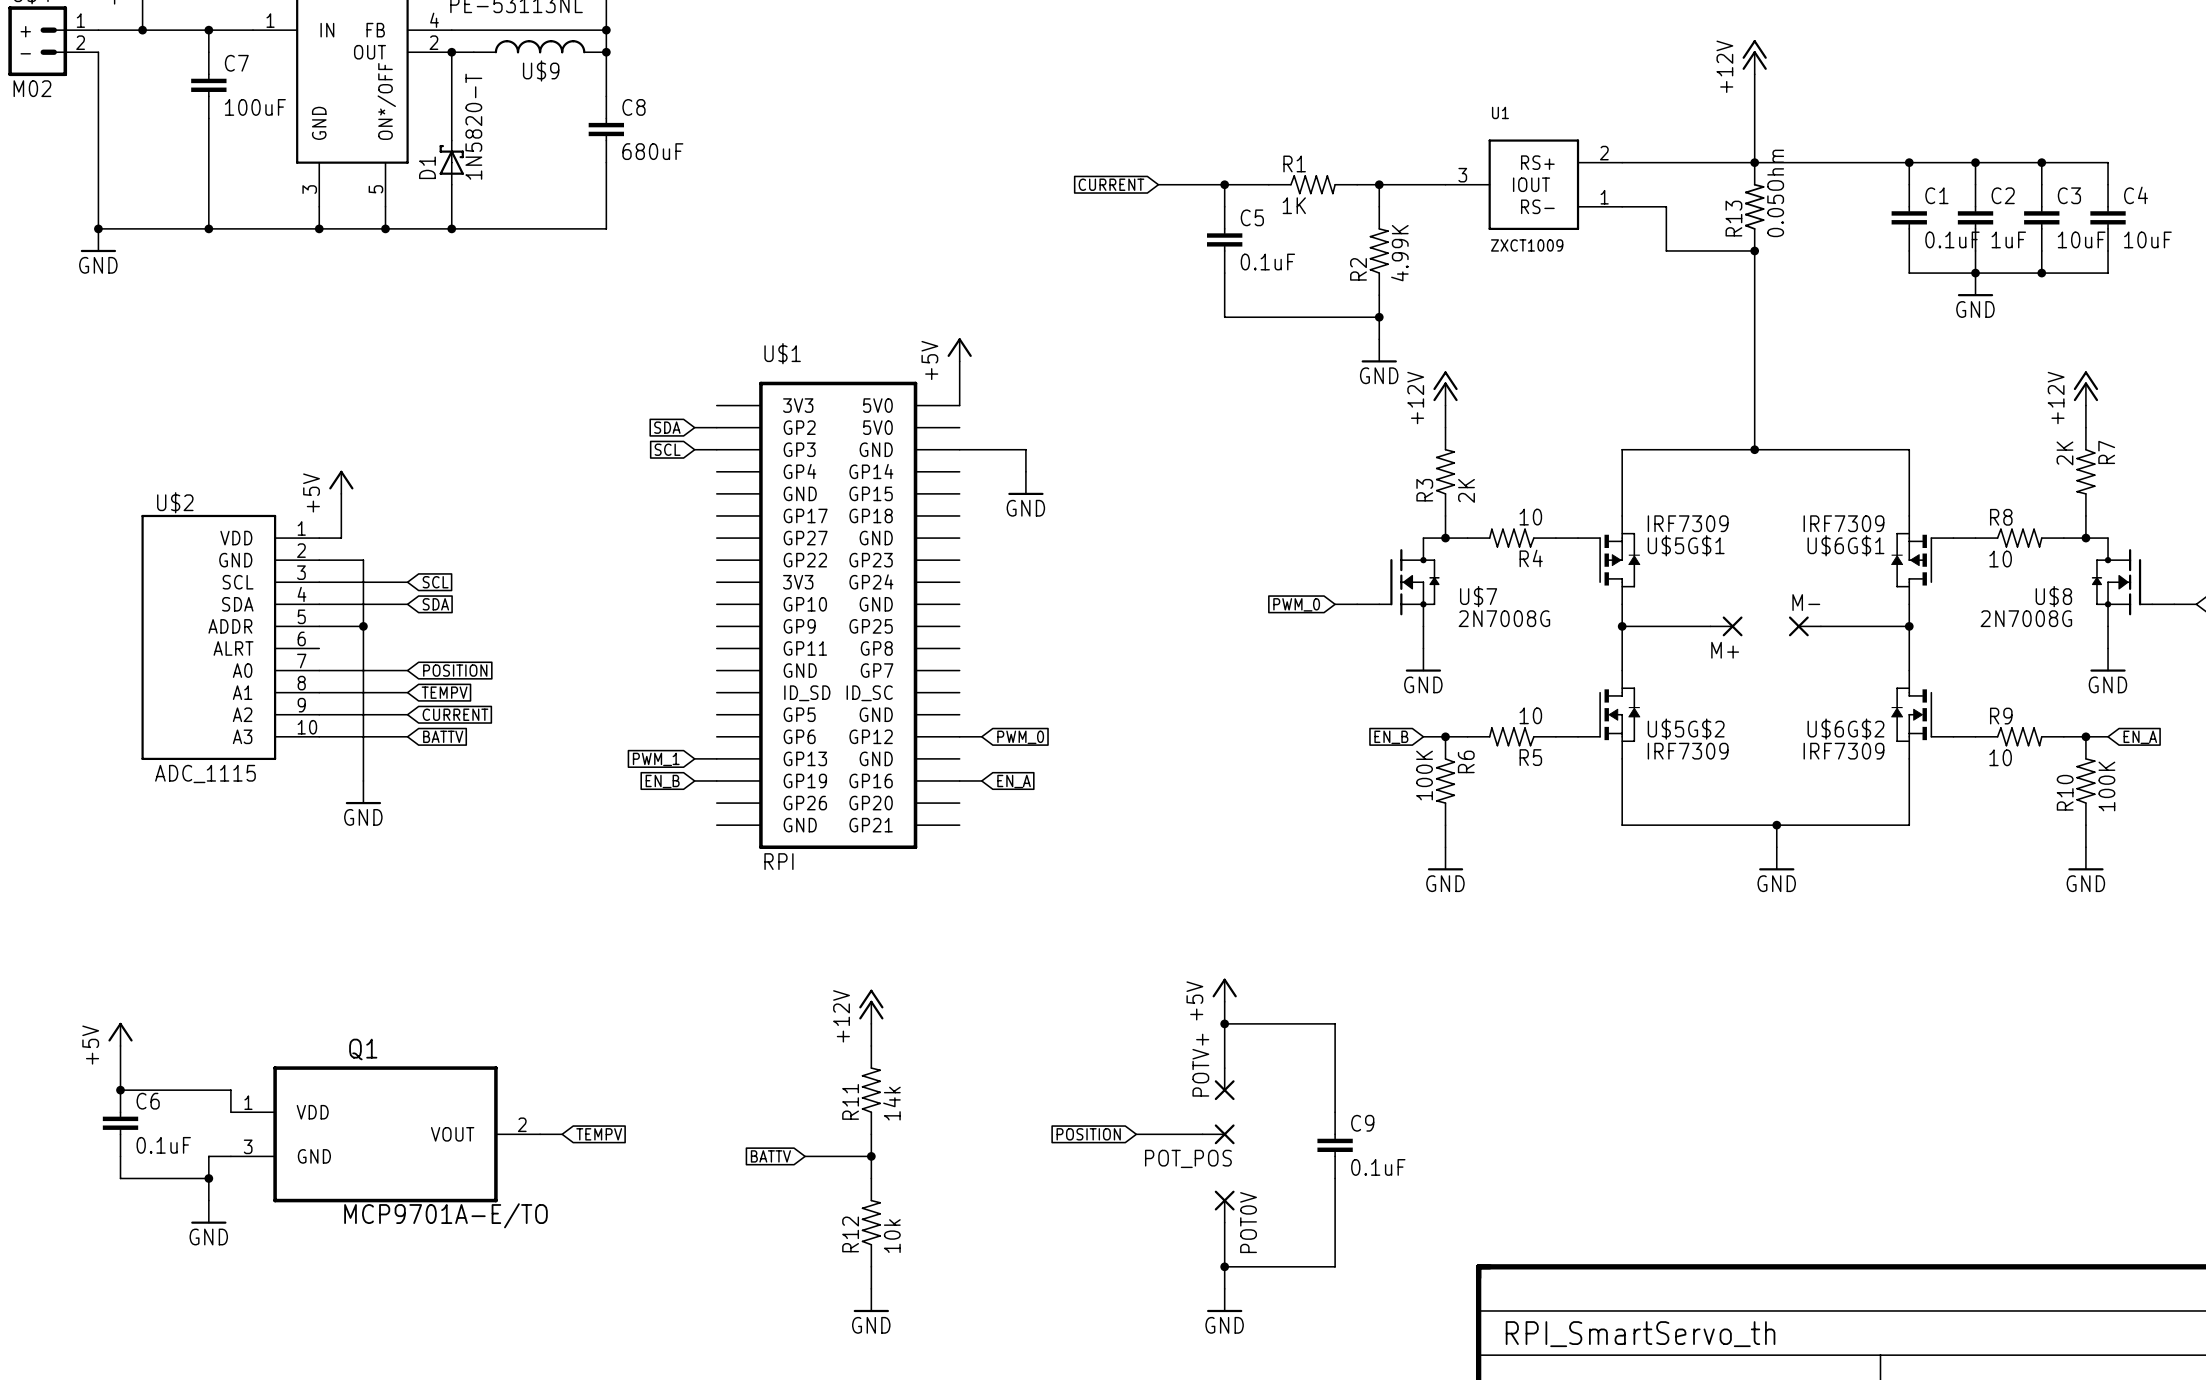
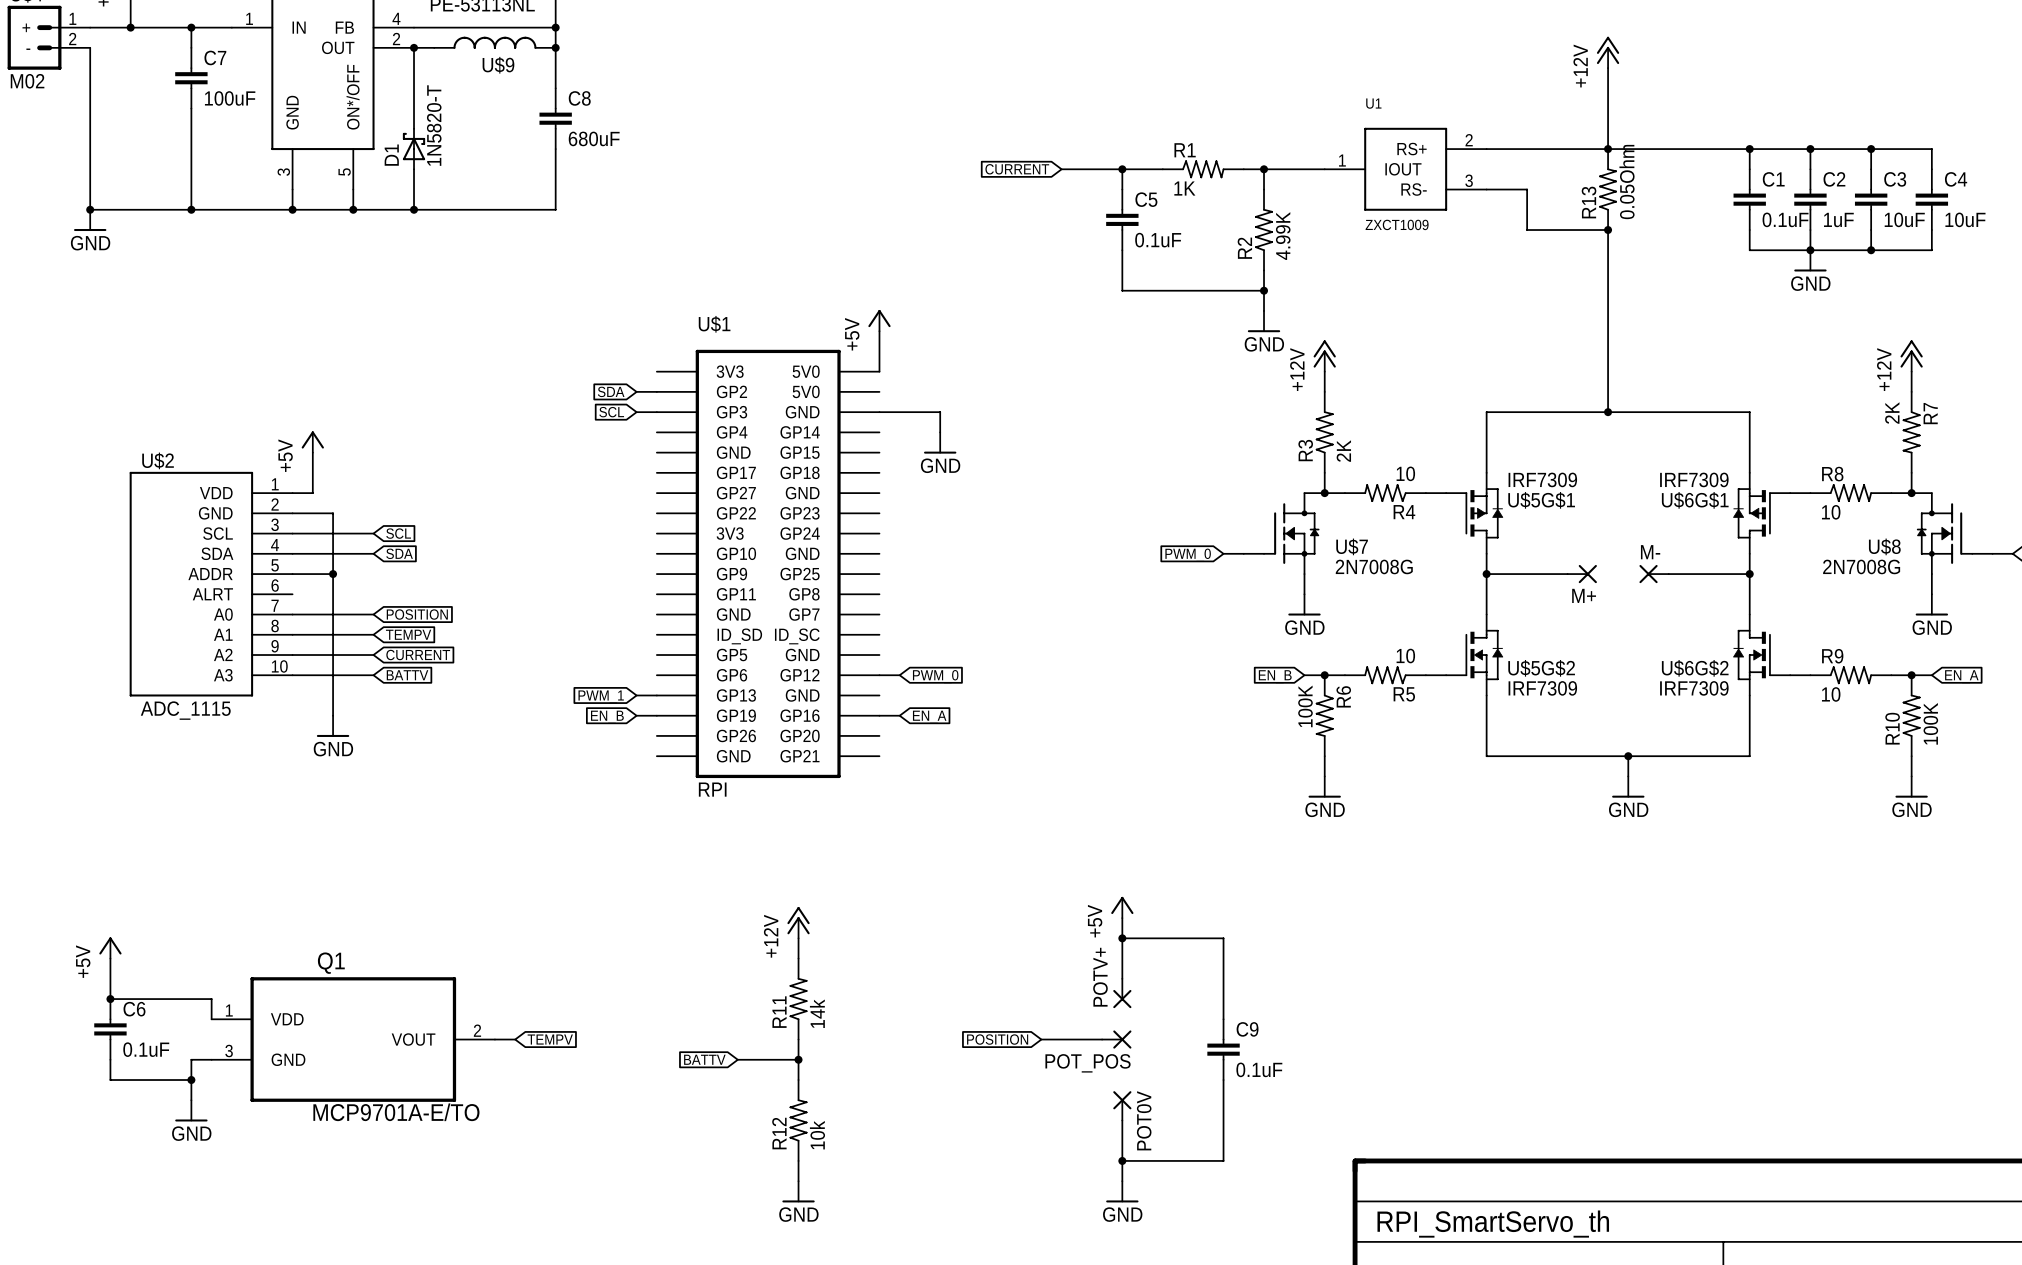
U1 pin number: 3 (1462, 175) -> 1 (1342, 160)
U1 pin number: 1 (1604, 197) -> 3 (1469, 180)

